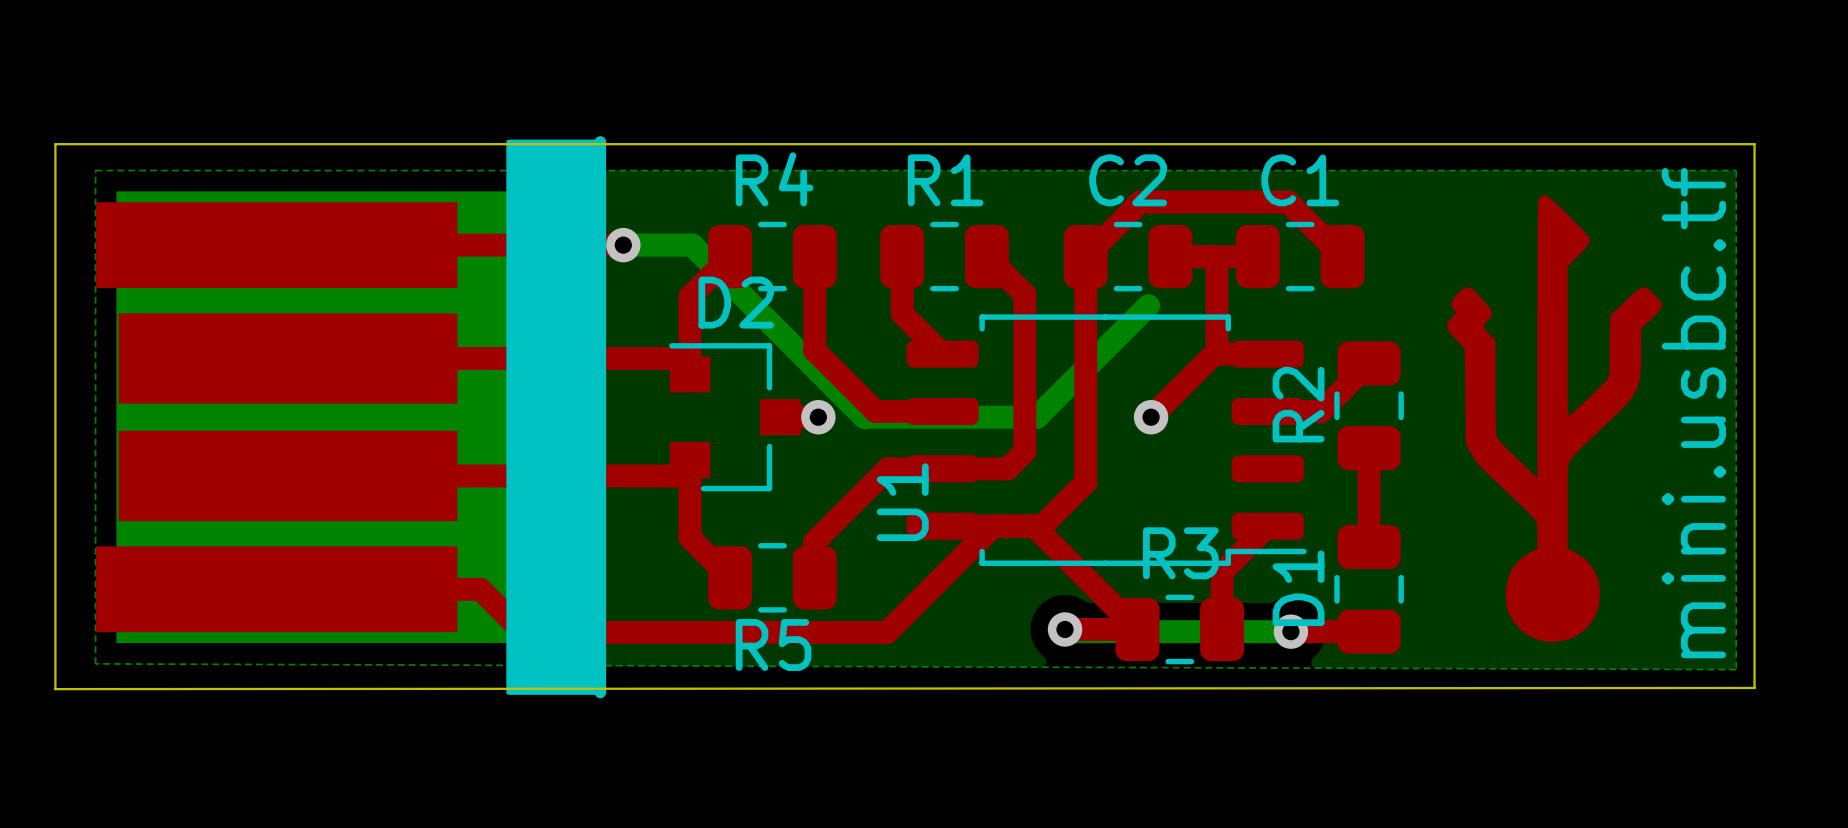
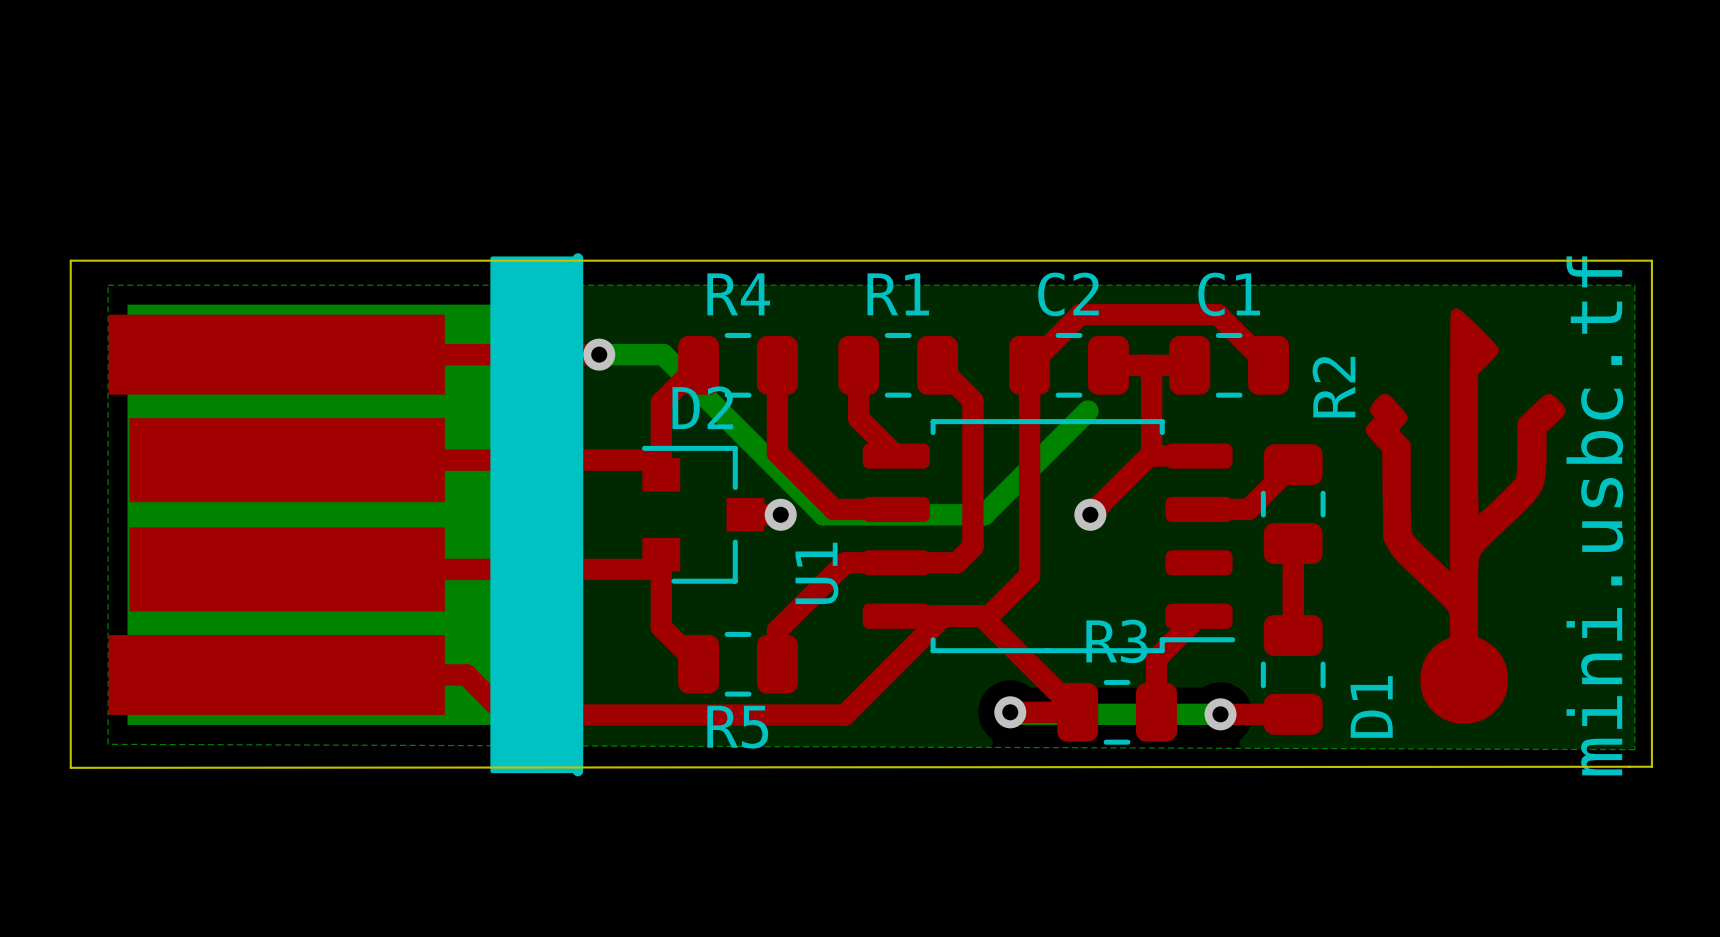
R2 name position: R2 (1298, 404) -> R2 (1333, 387)
U1 name position: U1 (902, 502) -> U1 (816, 573)
D1 name position: D1 (1298, 588) -> D1 (1371, 706)

